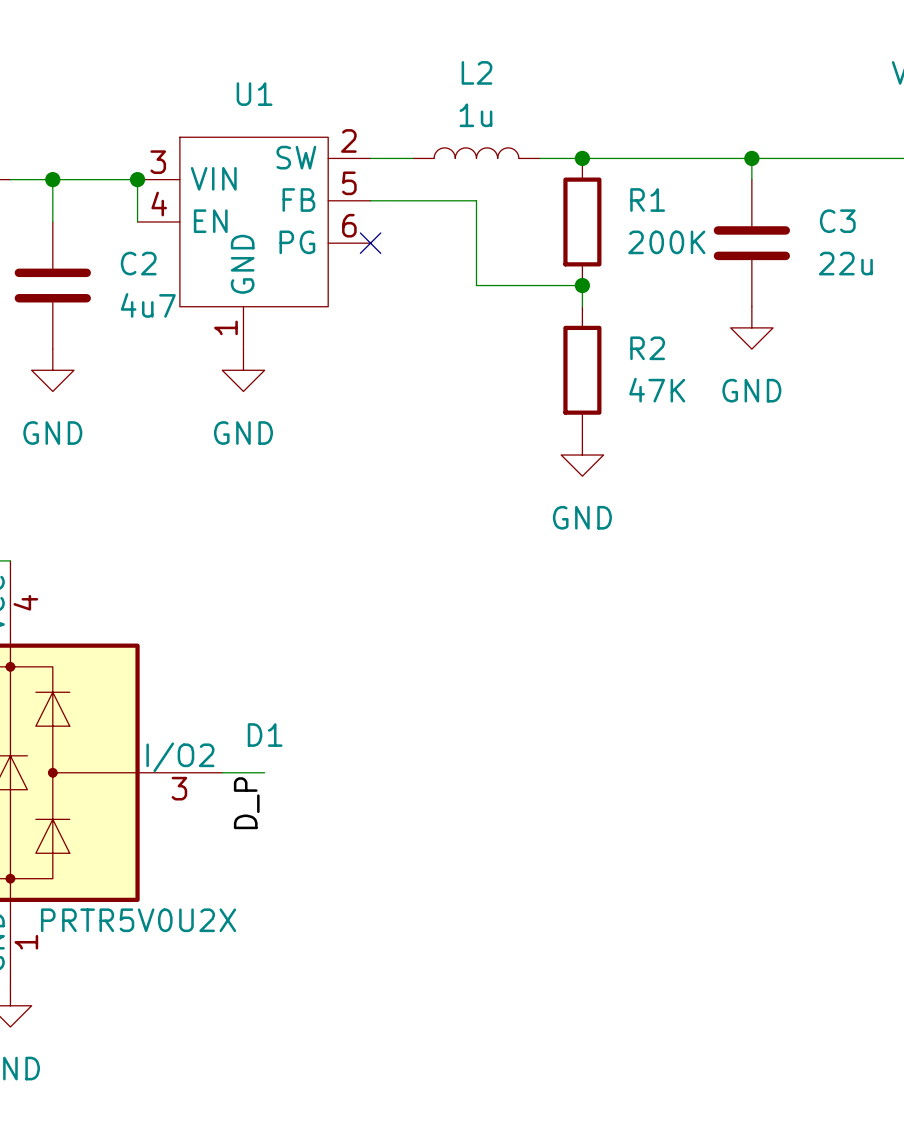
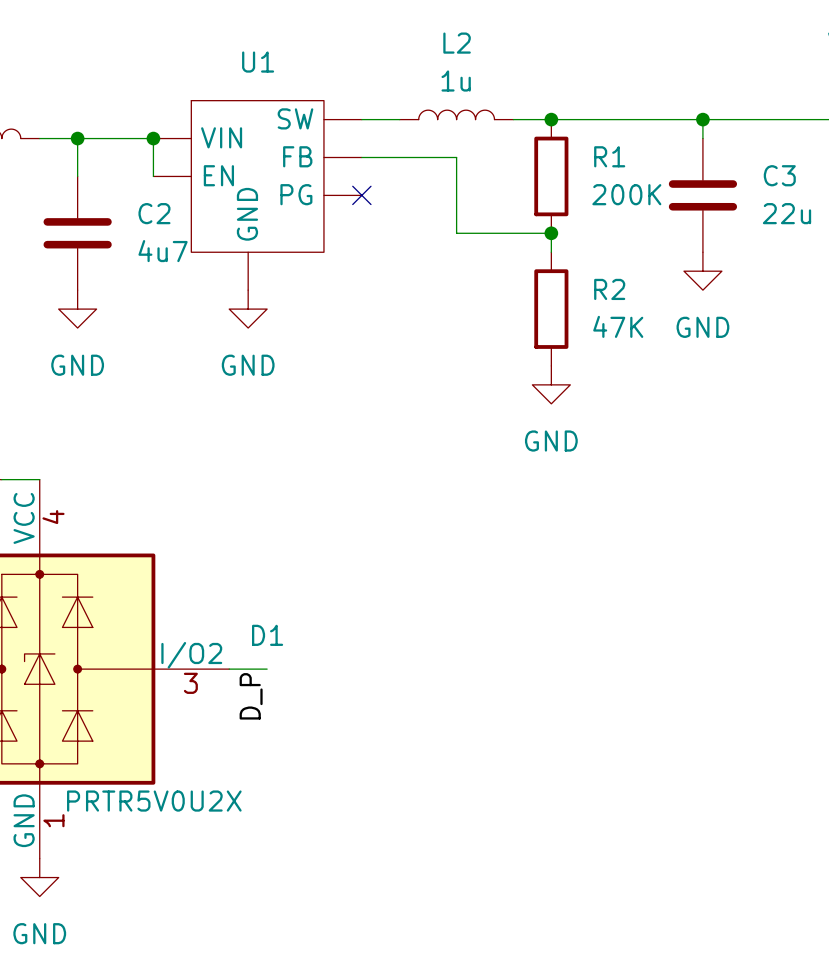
U1 pin number: 2 (348, 140) -> none
U1 pin number: 3 (158, 162) -> none
U1 pin number: 5 (349, 183) -> none
U1 pin number: 4 (159, 204) -> none
U1 pin number: 6 (349, 225) -> none
U1 pin number: 1 (225, 327) -> none

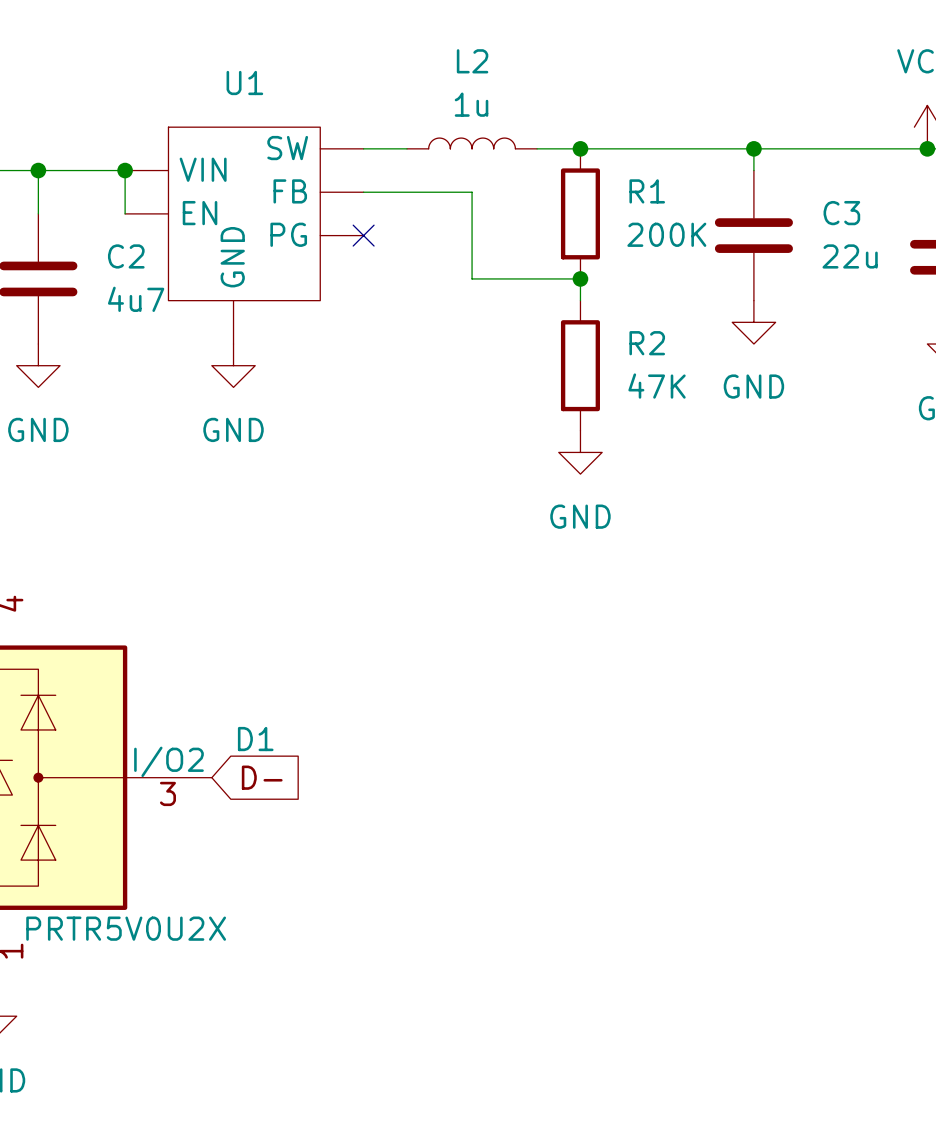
wire: (229, 669) (267, 669) -> none
global label: none -> D- (262, 777)
label: D_P (251, 696) -> none

